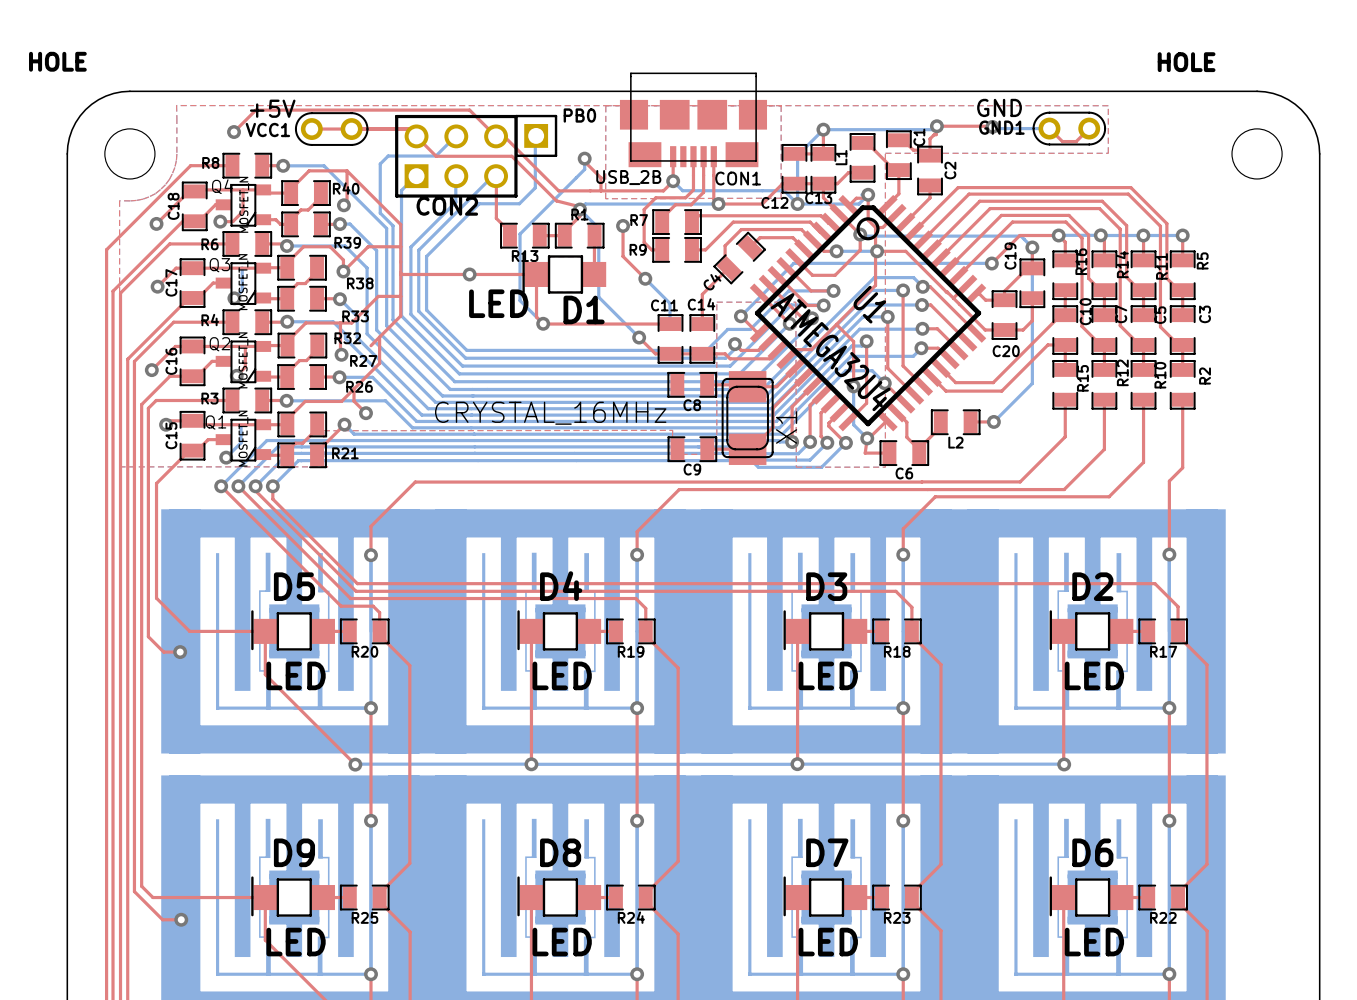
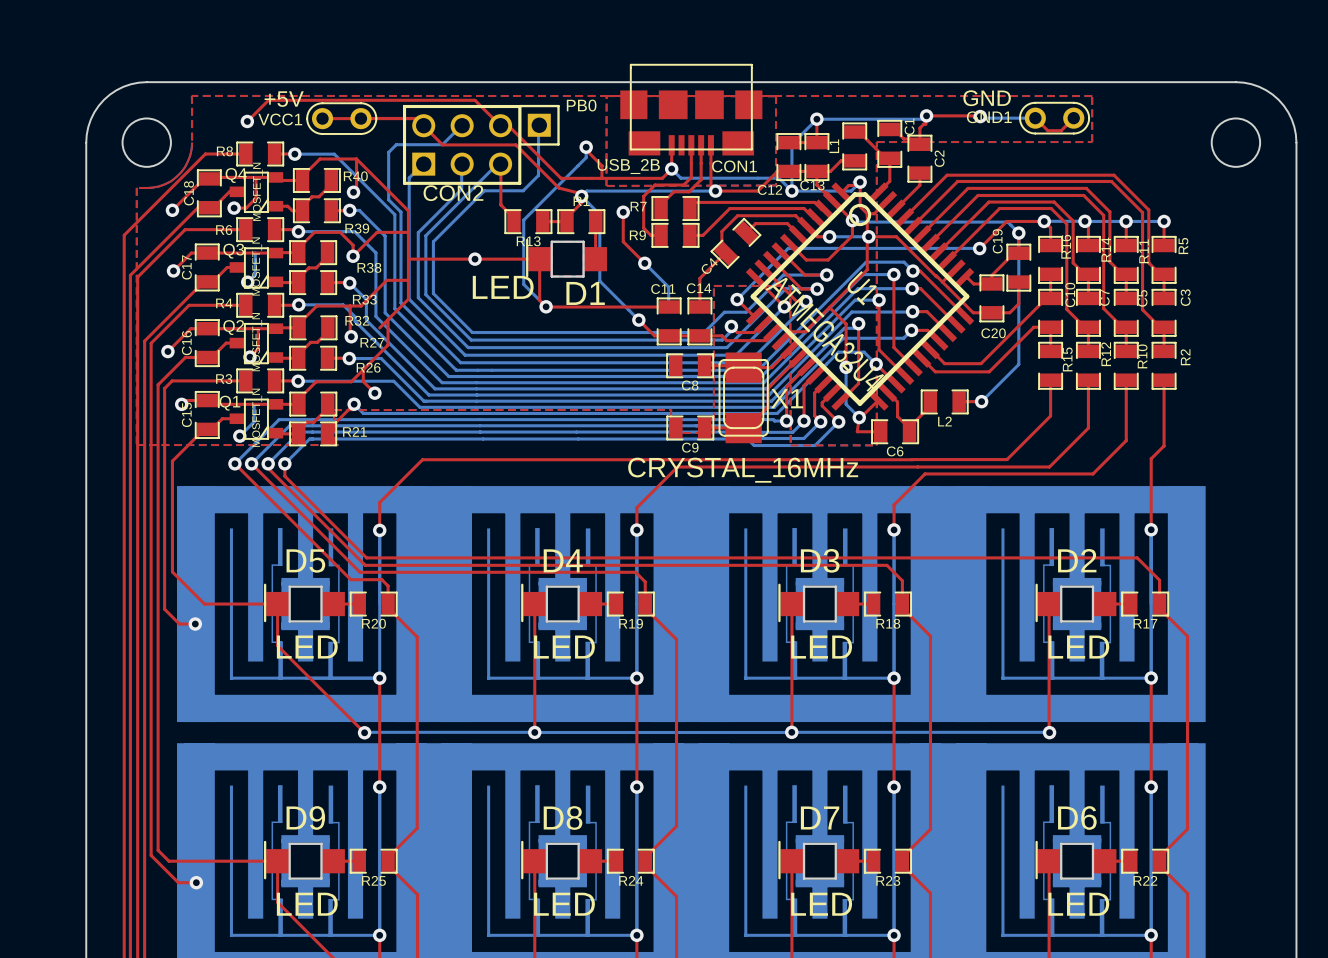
HOLE name: HOLE (57, 61) -> none
HOLE name: HOLE (1186, 62) -> none
X1 value position: CRYSTAL_16MHz (550, 413) -> CRYSTAL_16MHz (743, 470)
X1 name rotation: 0° (786, 427) -> 90° clockwise (787, 398)

